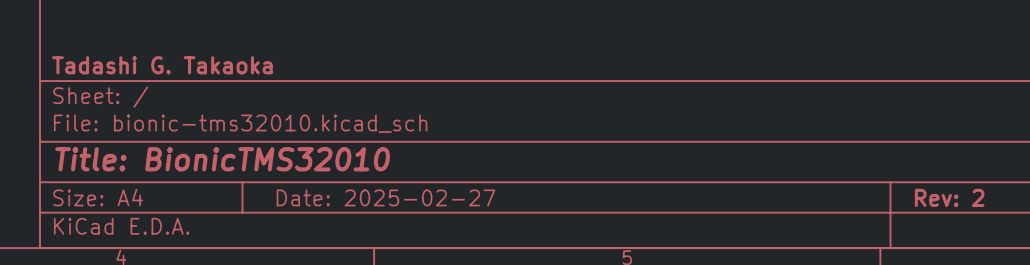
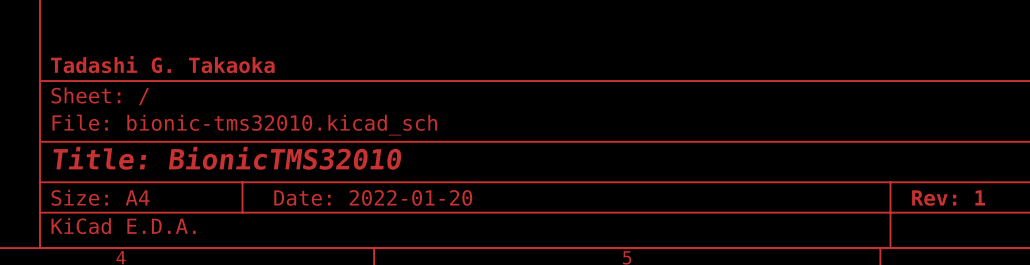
title block: Date: 2025-02-27 (385, 197) -> Date: 2022-01-20 (373, 197)
title block: Rev: 2 (949, 197) -> Rev: 1 (948, 198)

